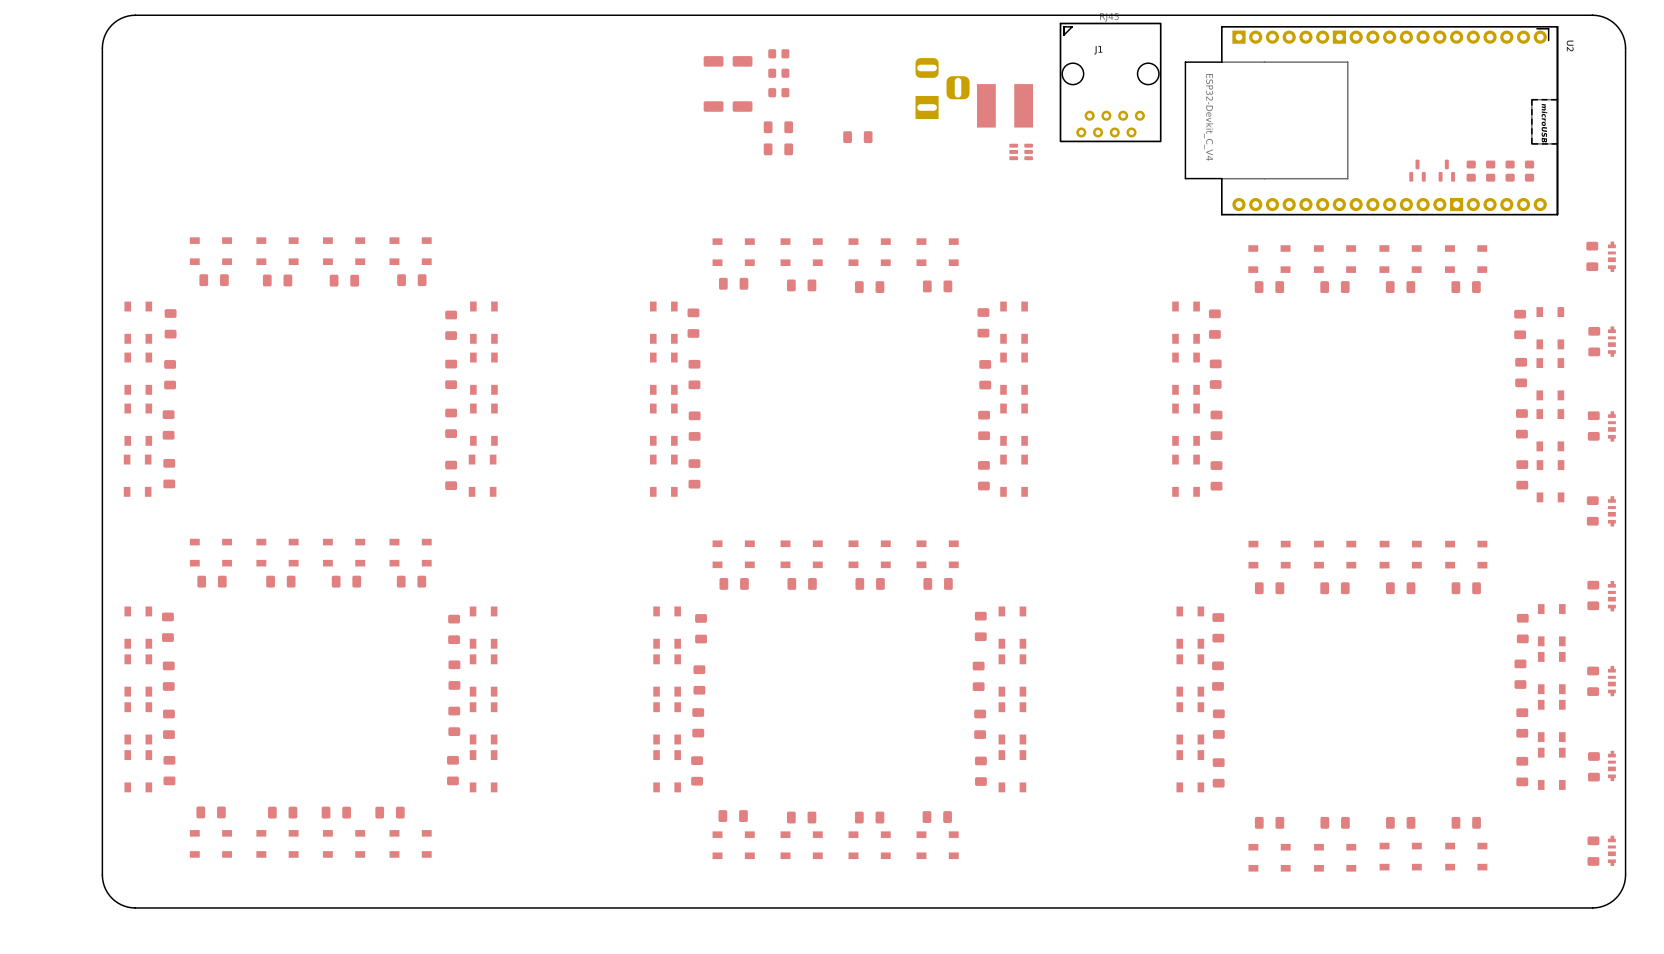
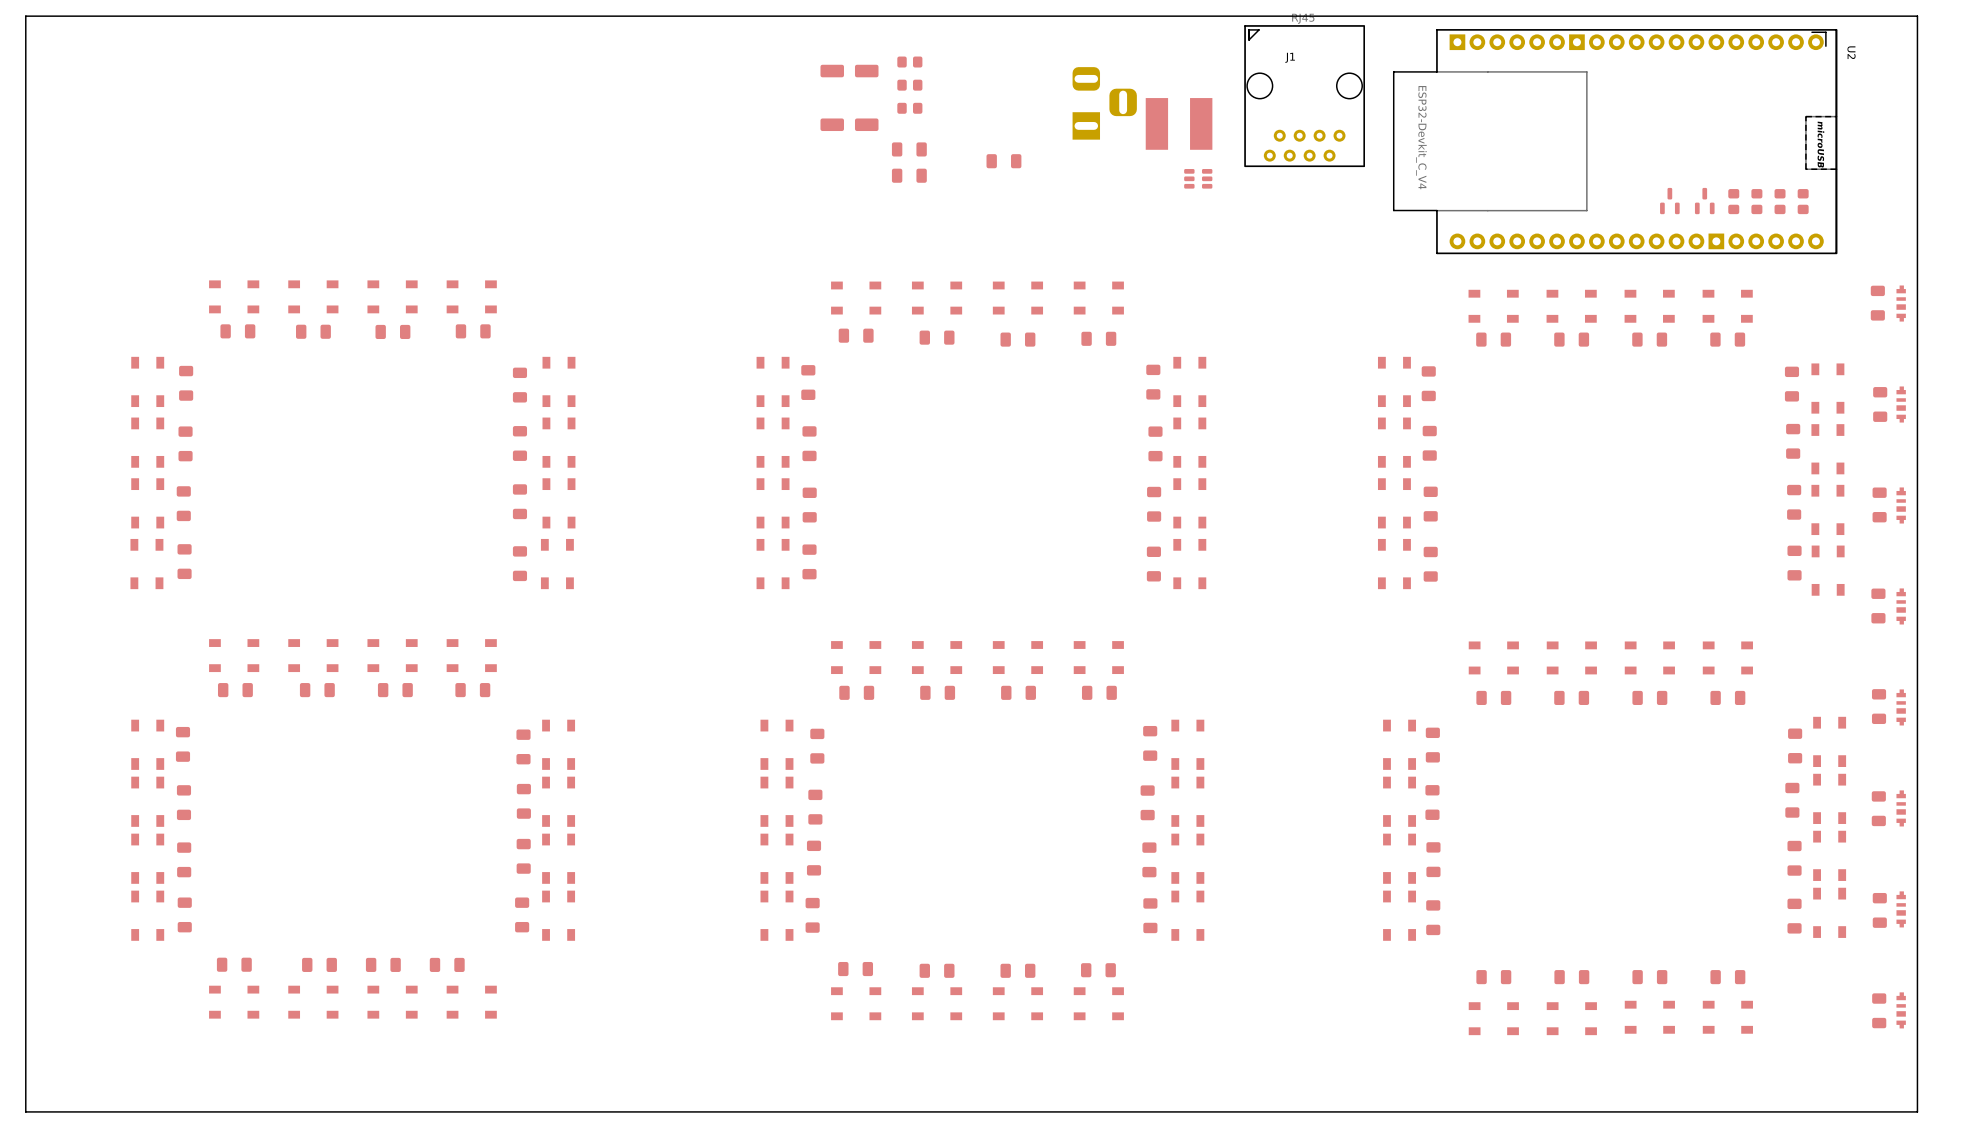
board edge: (135, 15) (121, 18) (112, 24) (104, 37) (102, 48) (102, 875) (107, 892) (117, 902) (135, 907) (1592, 907) (1606, 904) (1615, 898) (1623, 885) (1625, 875) -> (144, 16) (25, 16) (25, 1111) (1917, 1111) (1917, 1039)
board edge: (1592, 15) (1603, 17) (1615, 24) (1622, 33) (1625, 48) -> (1878, 16) (1917, 16) (1917, 55)

